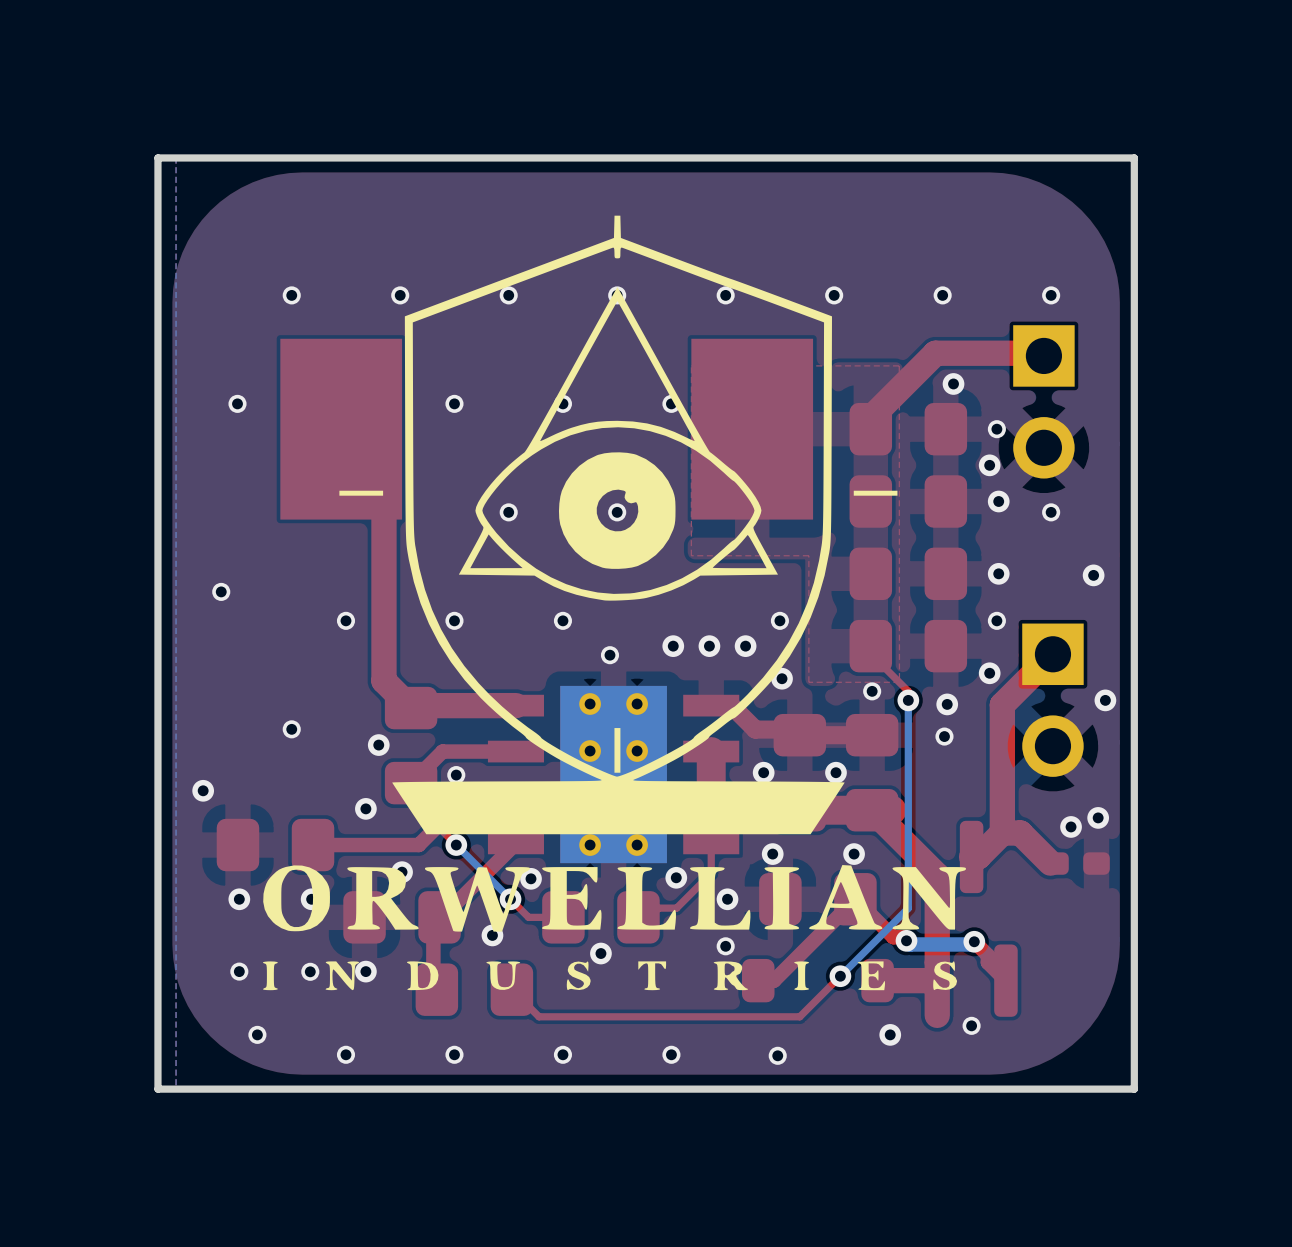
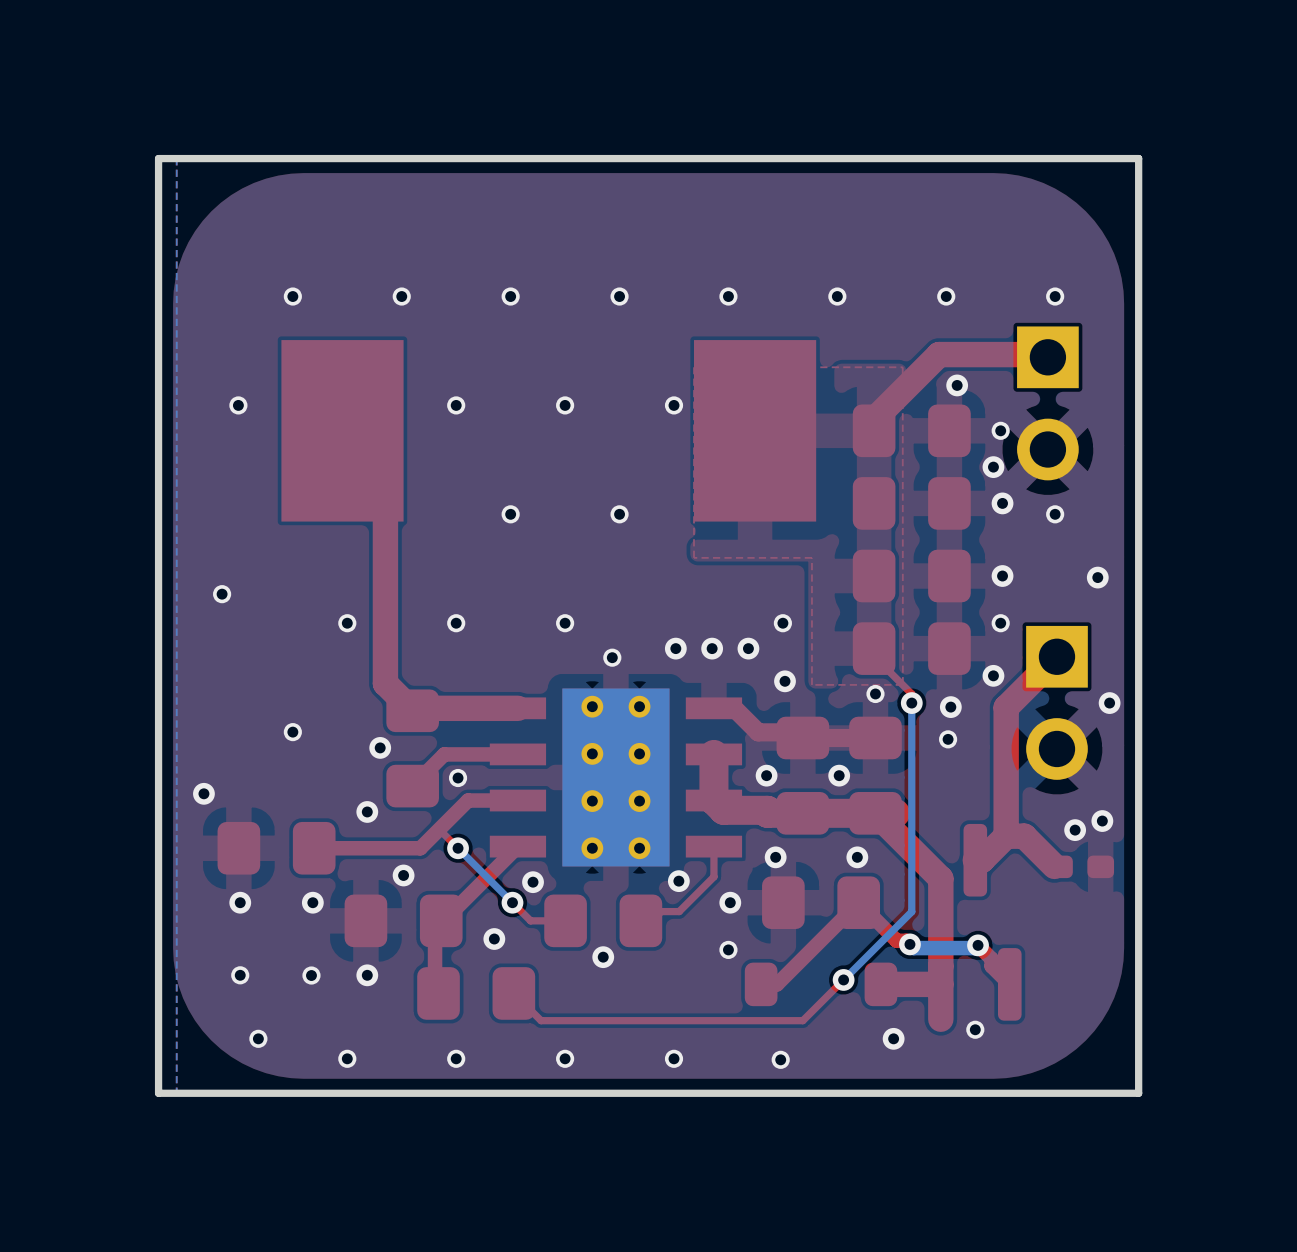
drawing: [262, 215, 966, 991] -> none

